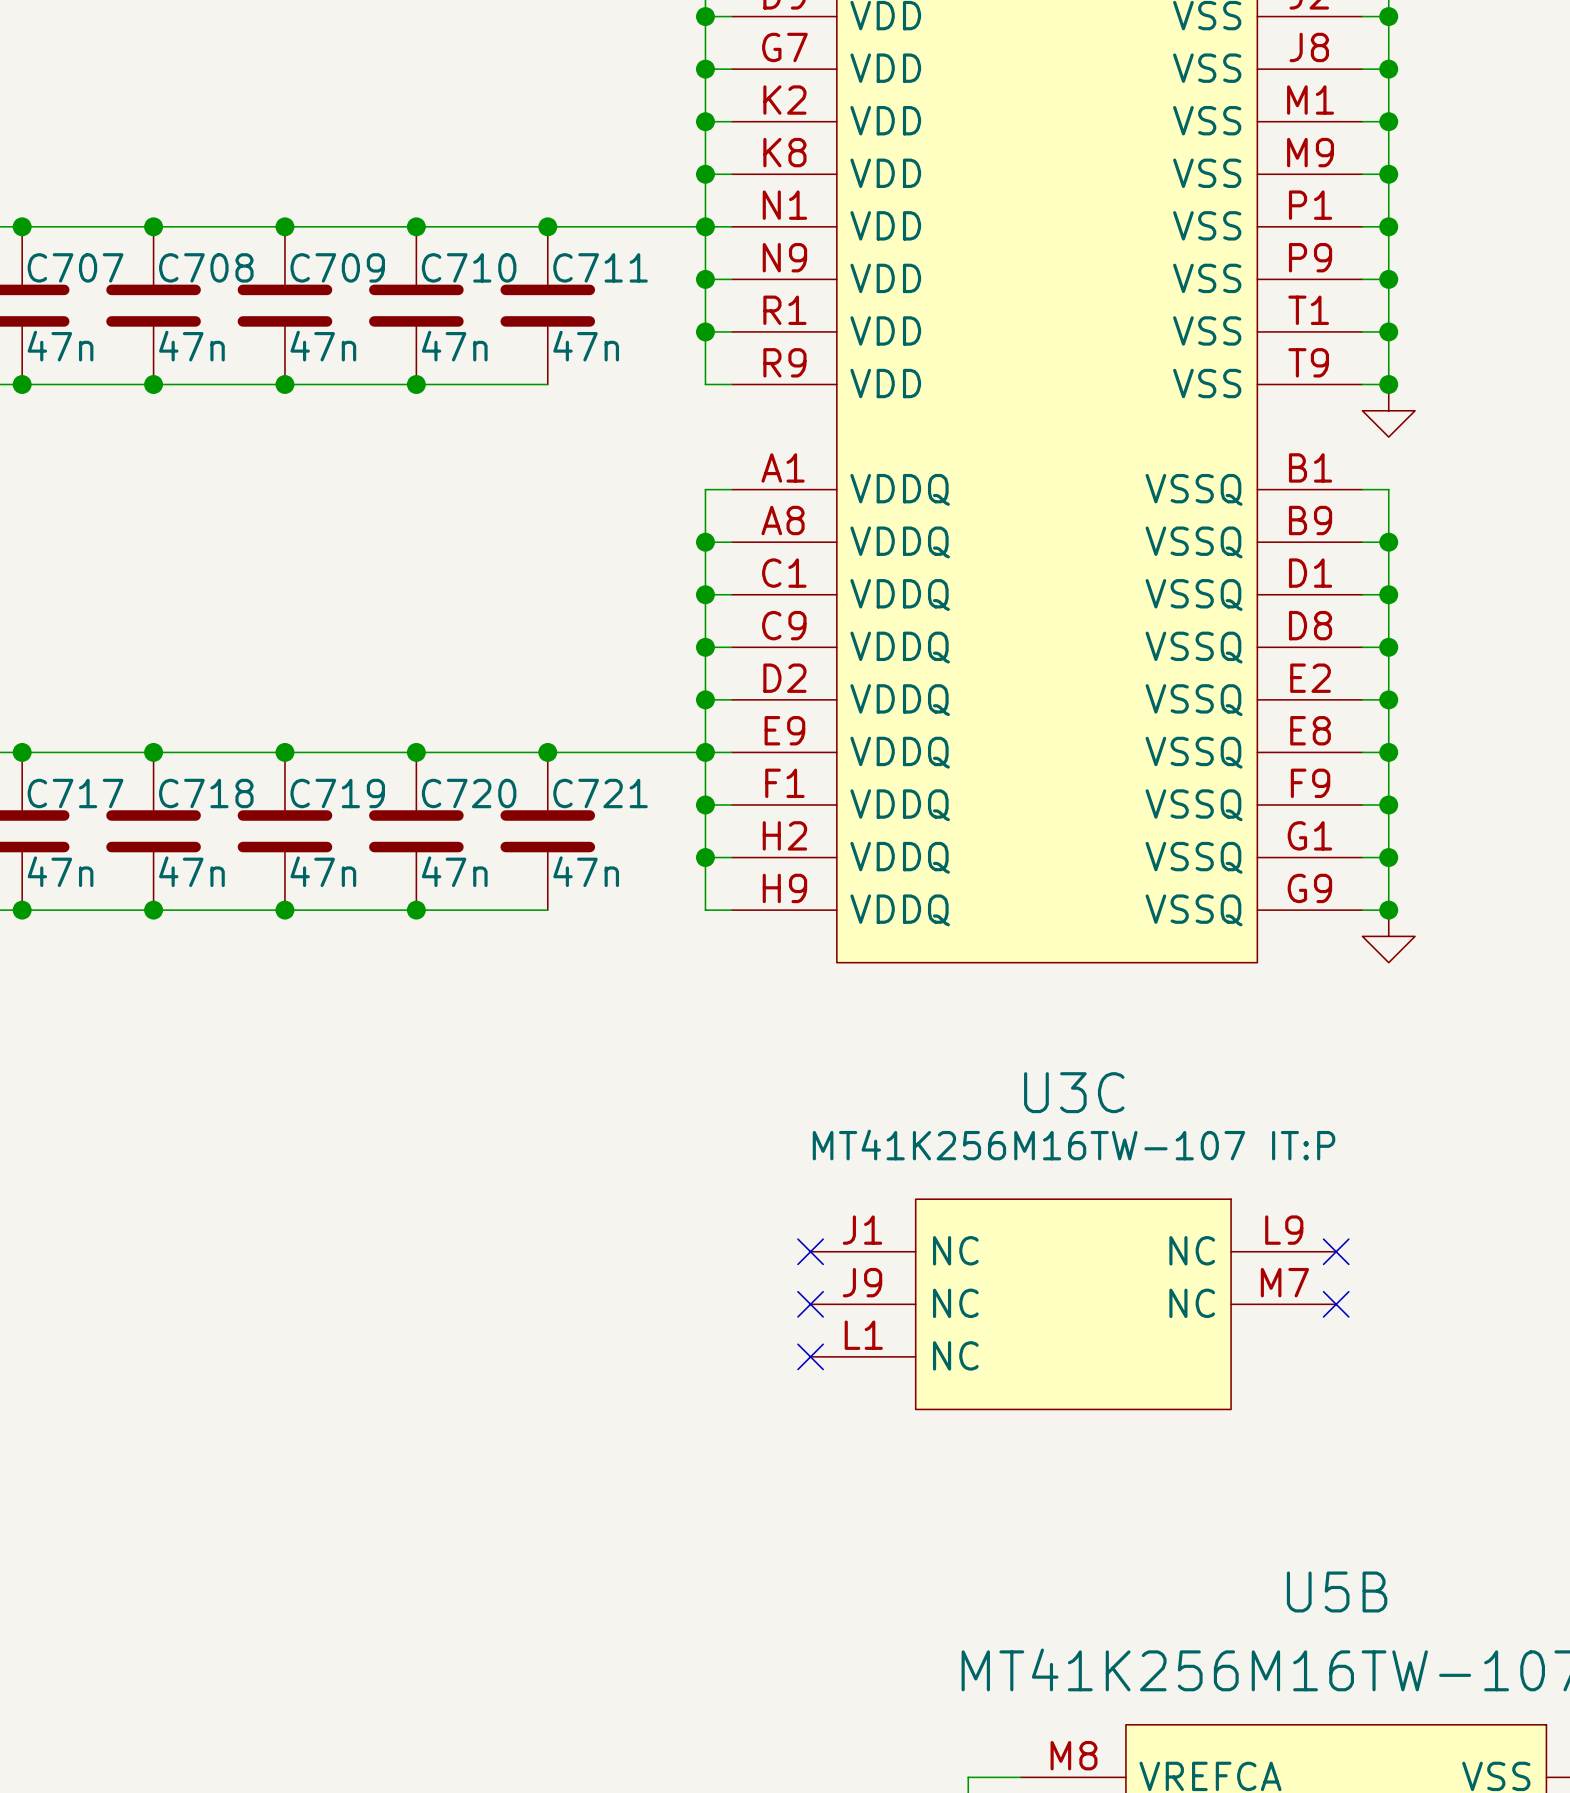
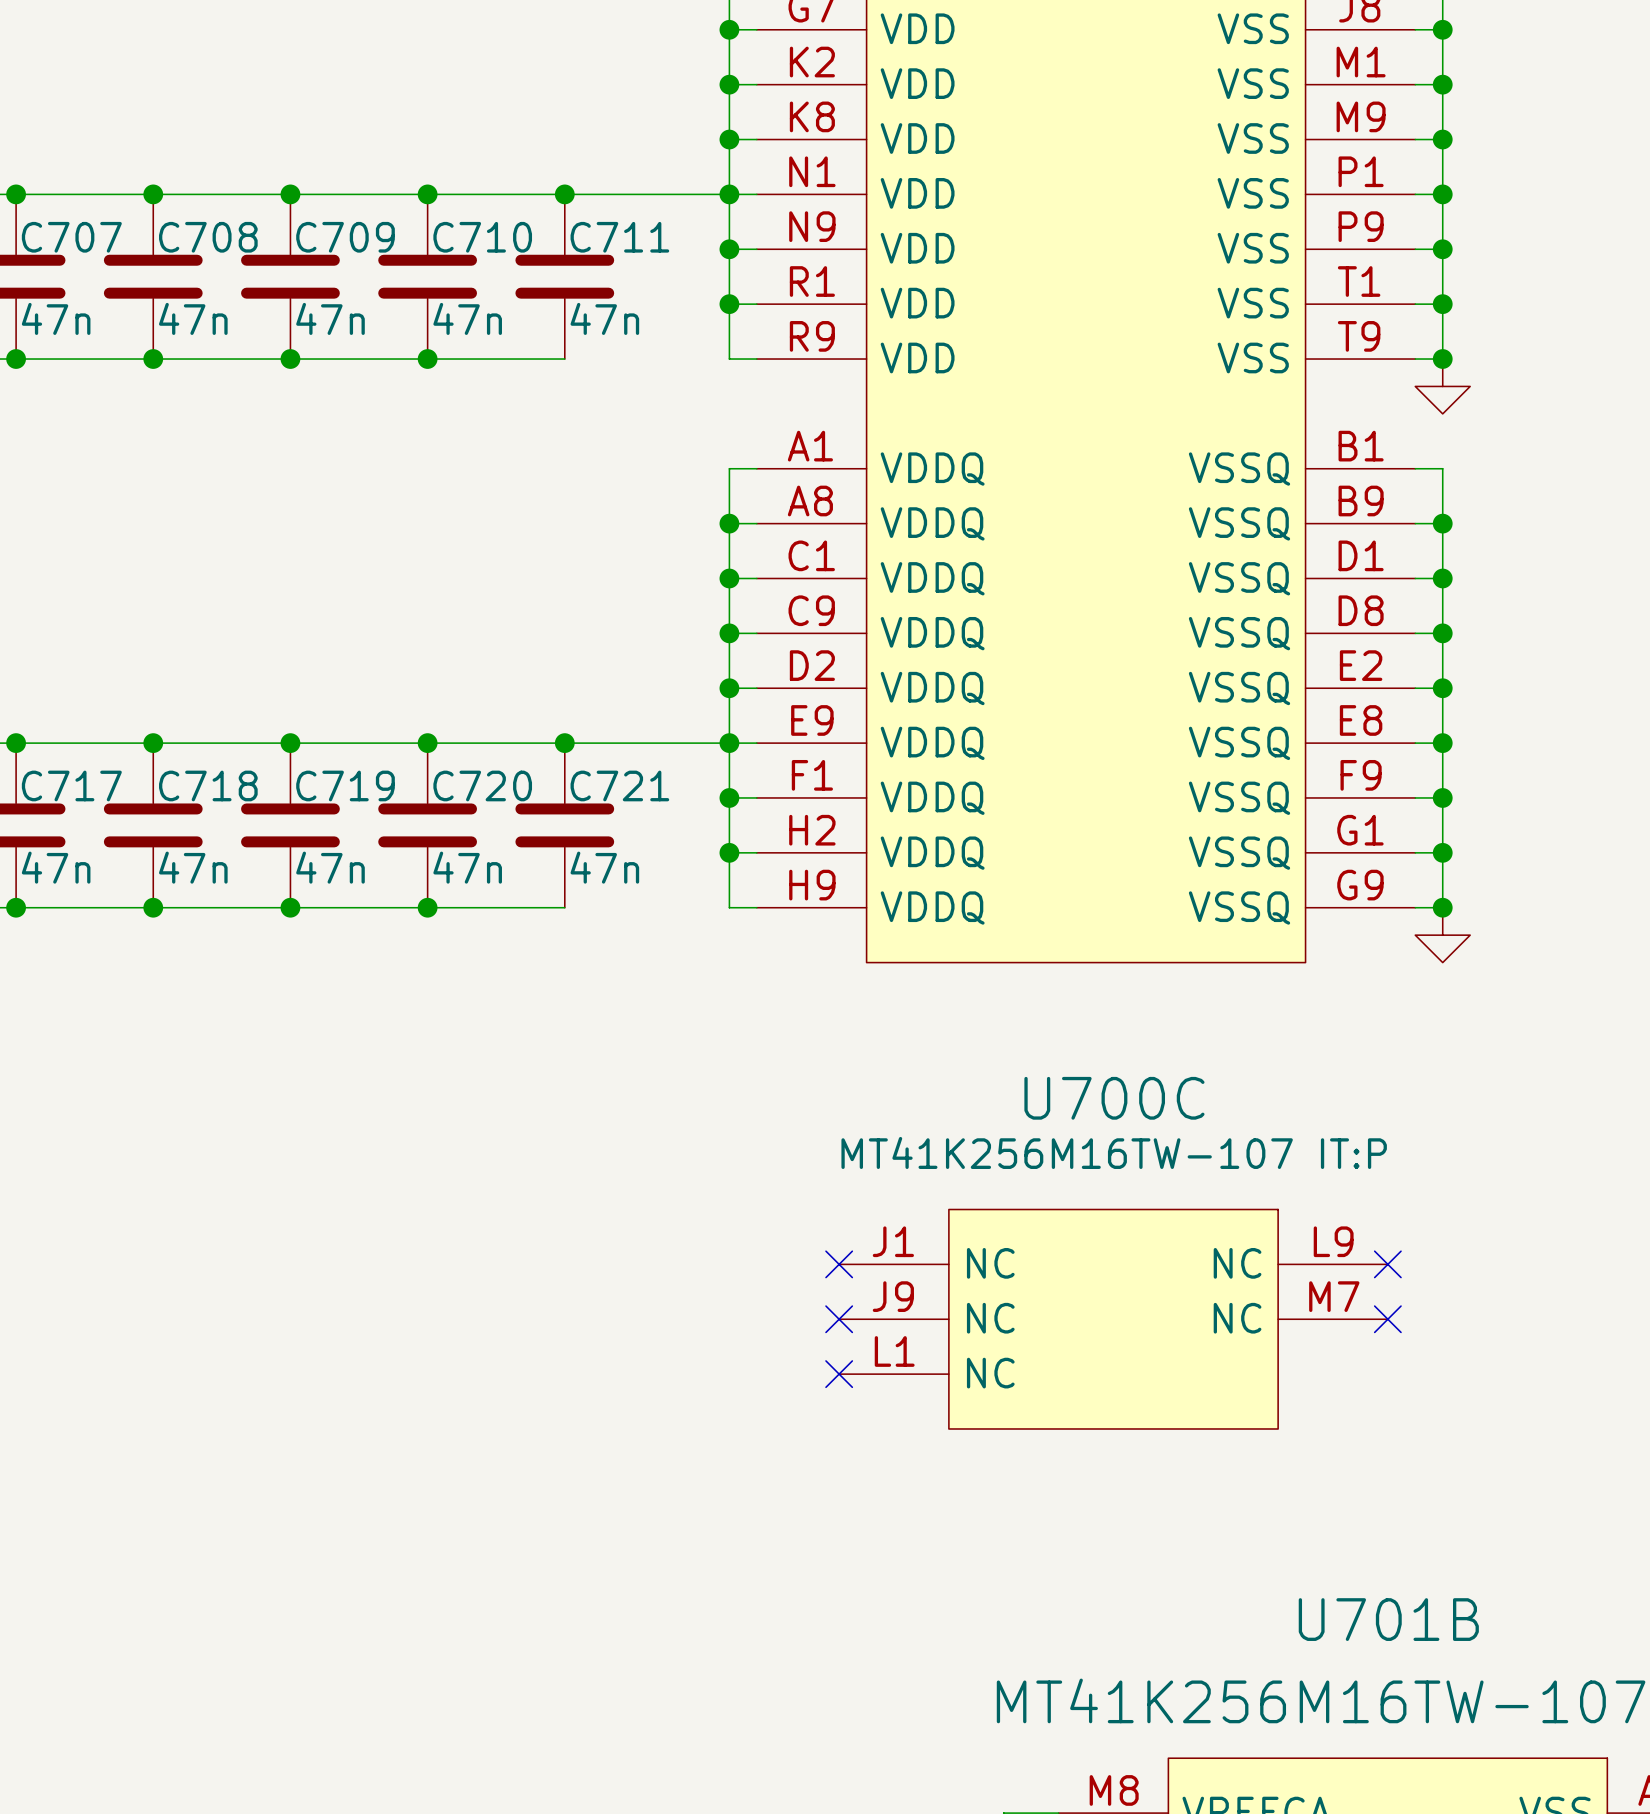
U3C name: U3C (1074, 1092) -> U700C (1114, 1098)
U5B name: U5B (1337, 1591) -> U701B (1388, 1619)

